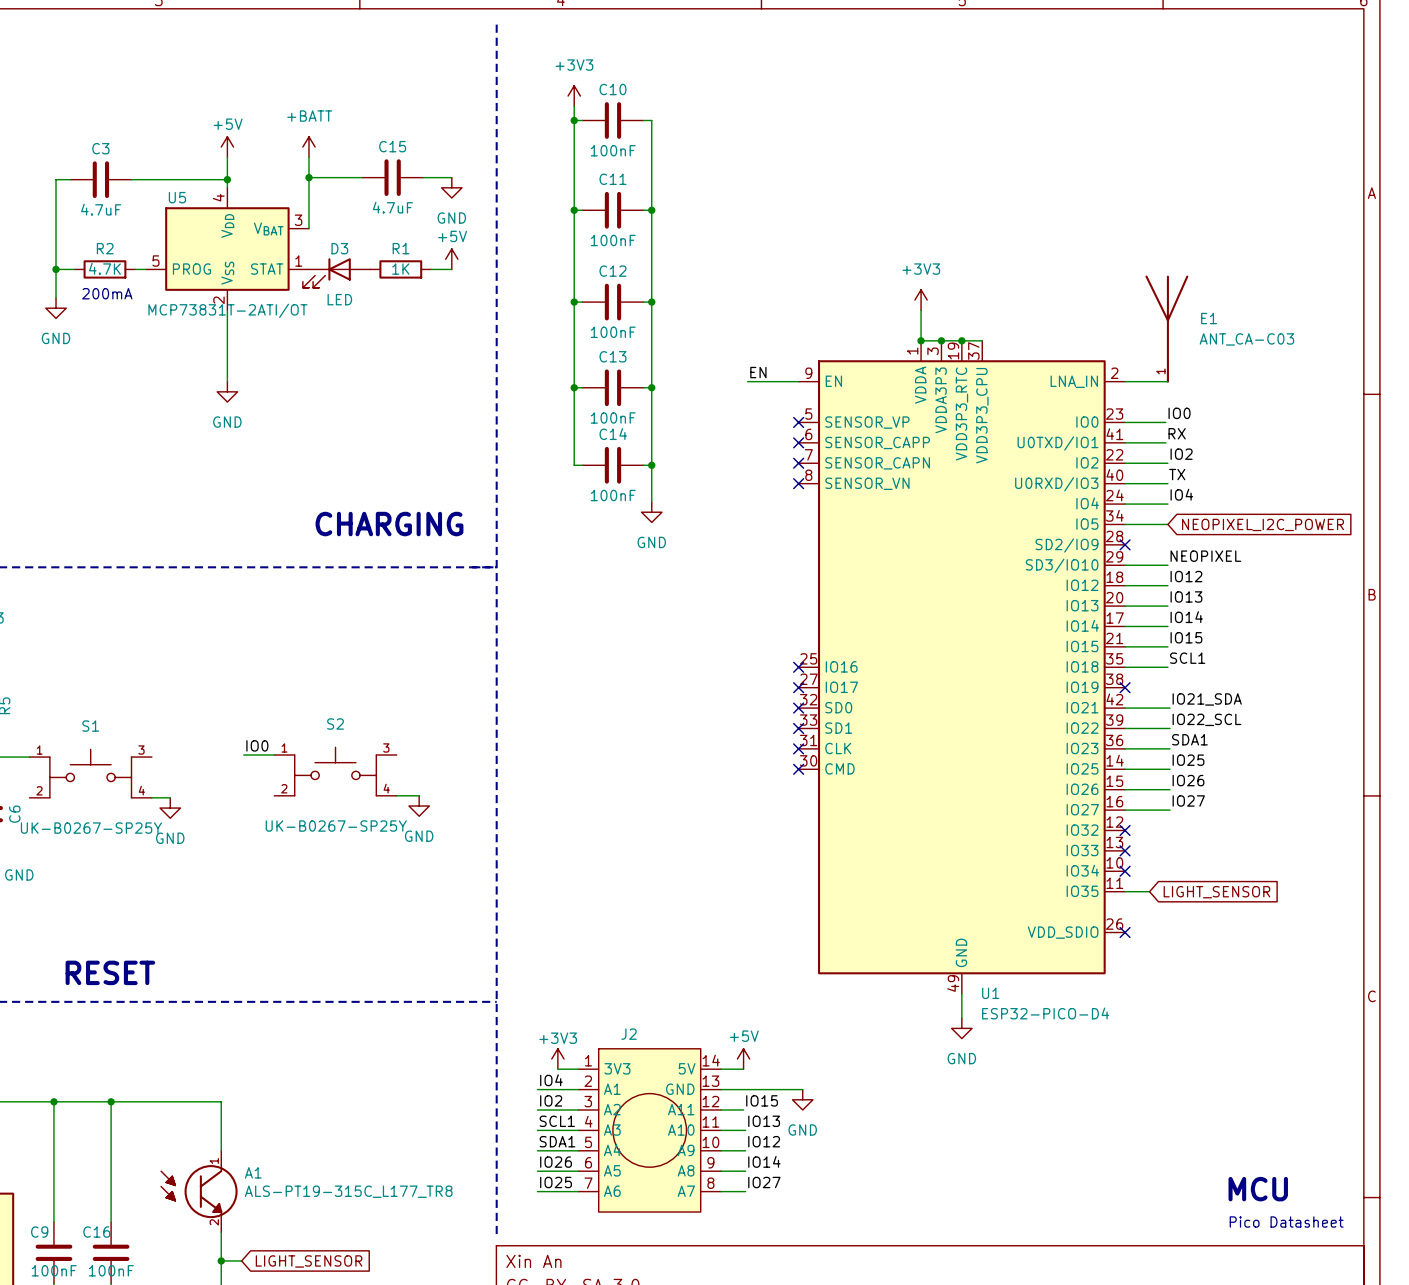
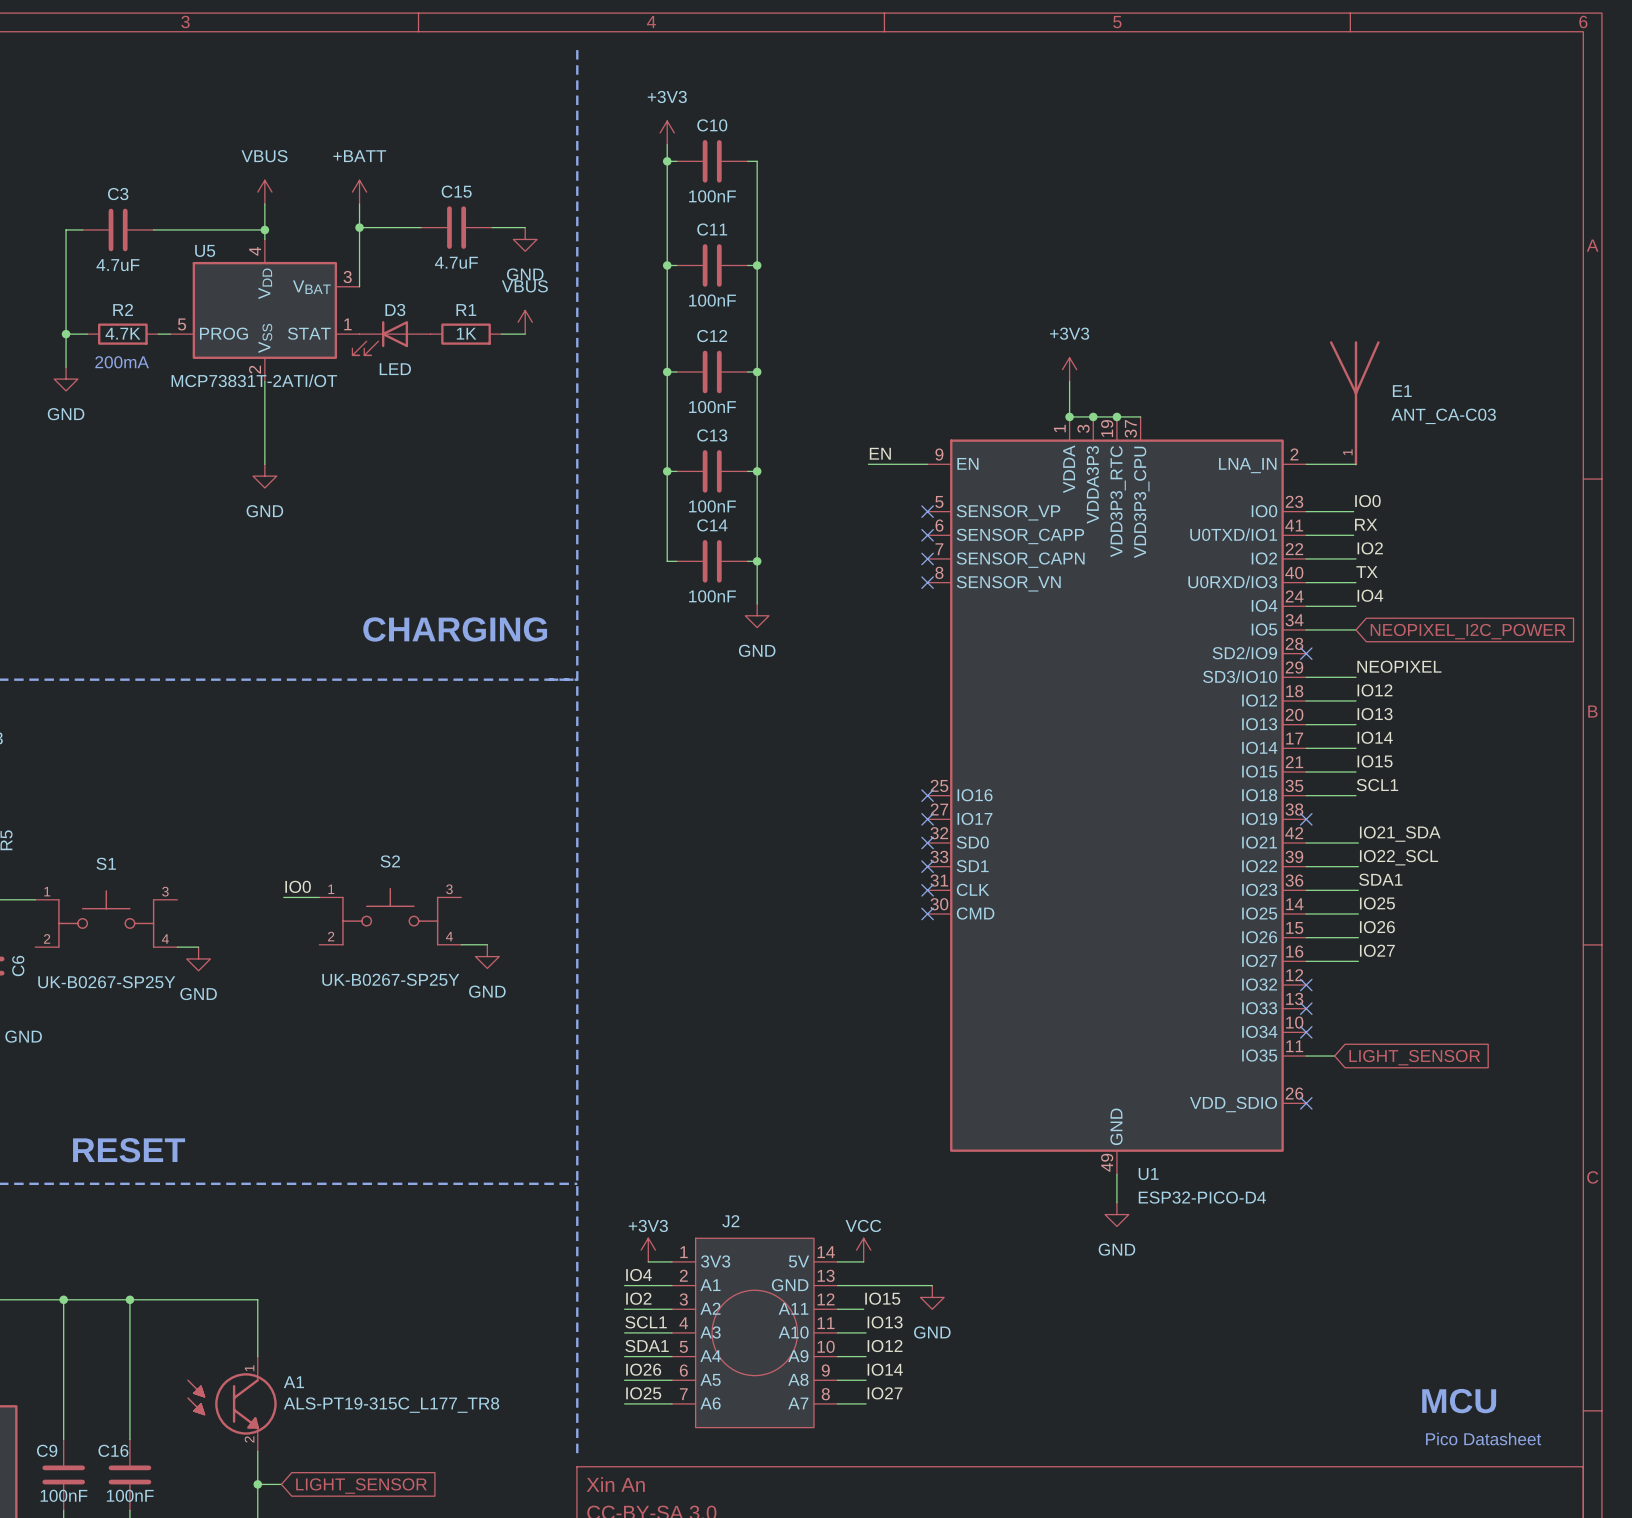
power symbol: +5V (227, 147) -> VBUS (264, 192)
power symbol: +5V (451, 259) -> VBUS (525, 322)
power symbol: +5V (743, 1058) -> VCC (863, 1250)

